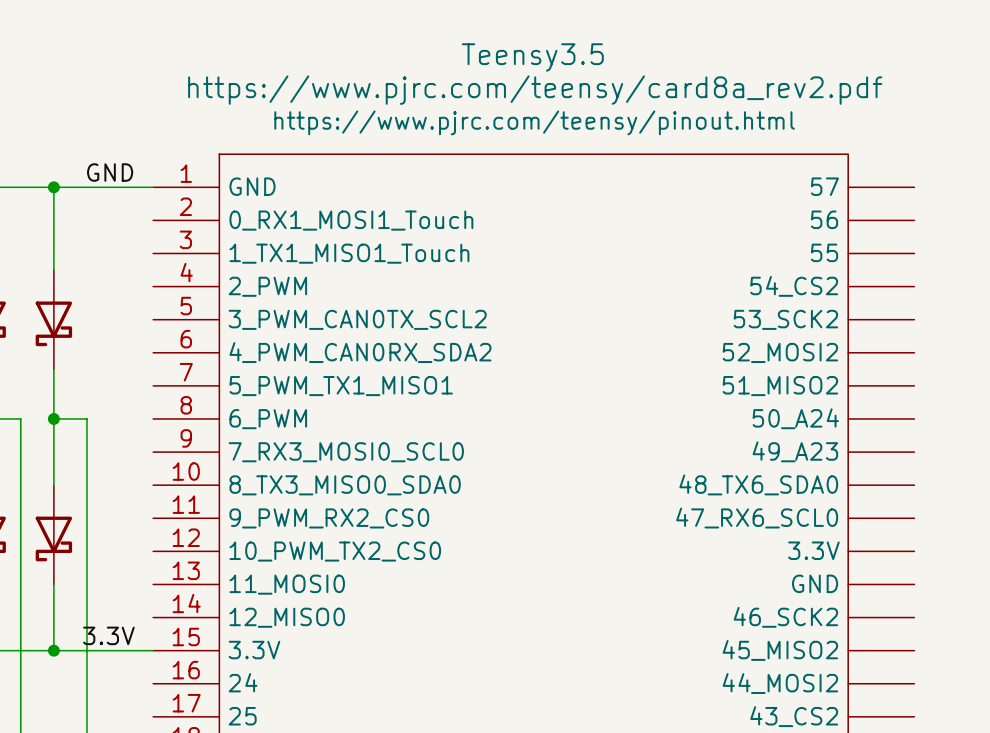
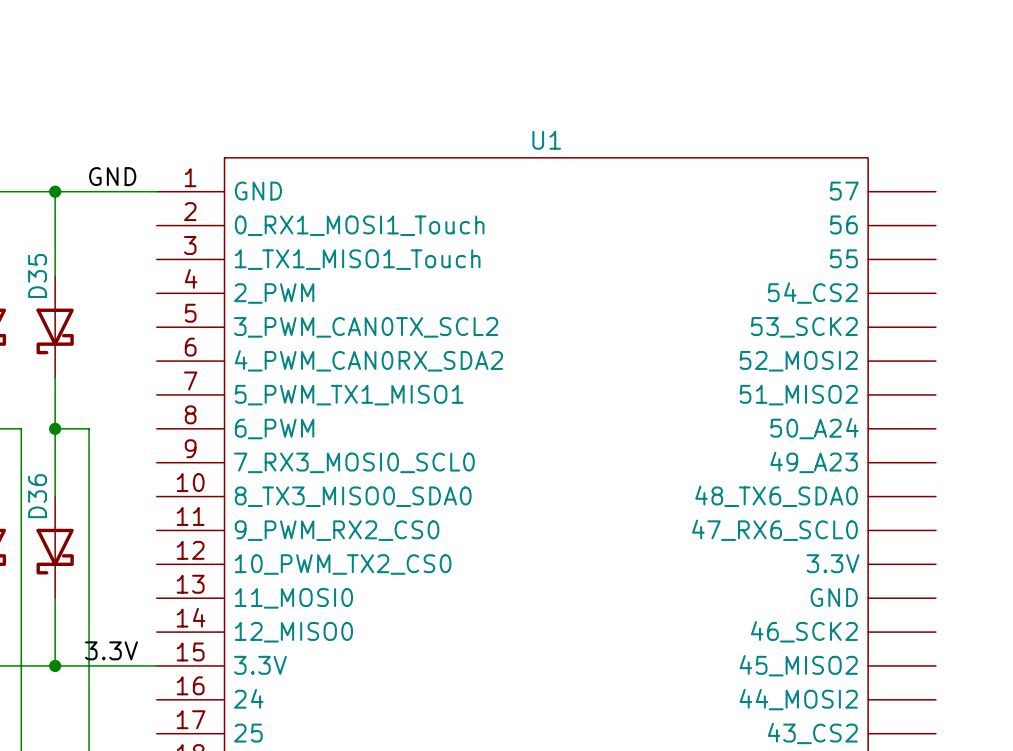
U1 value: Teensy3.5 (532, 57) -> none
U1 text: https://www.pjrc.com/teensy/card8a_rev2.pdf (535, 90) -> none
U1 text: https://www.pjrc.com/teensy/pinout.html (534, 122) -> none
U1 name: none -> U1 (546, 140)
D35 name: none -> D35 (37, 275)
D36 name: none -> D36 (37, 496)

